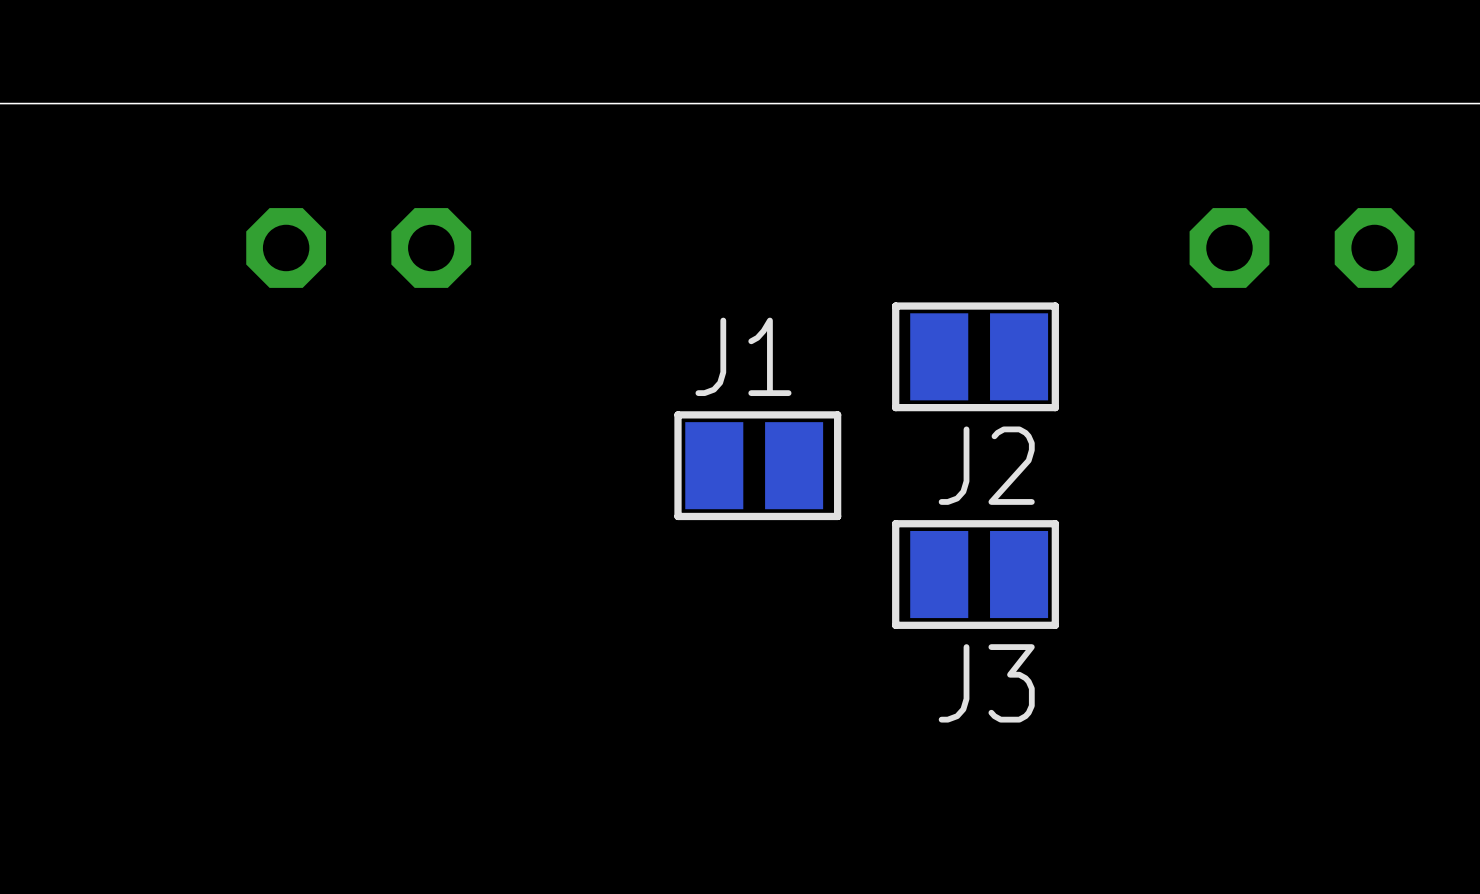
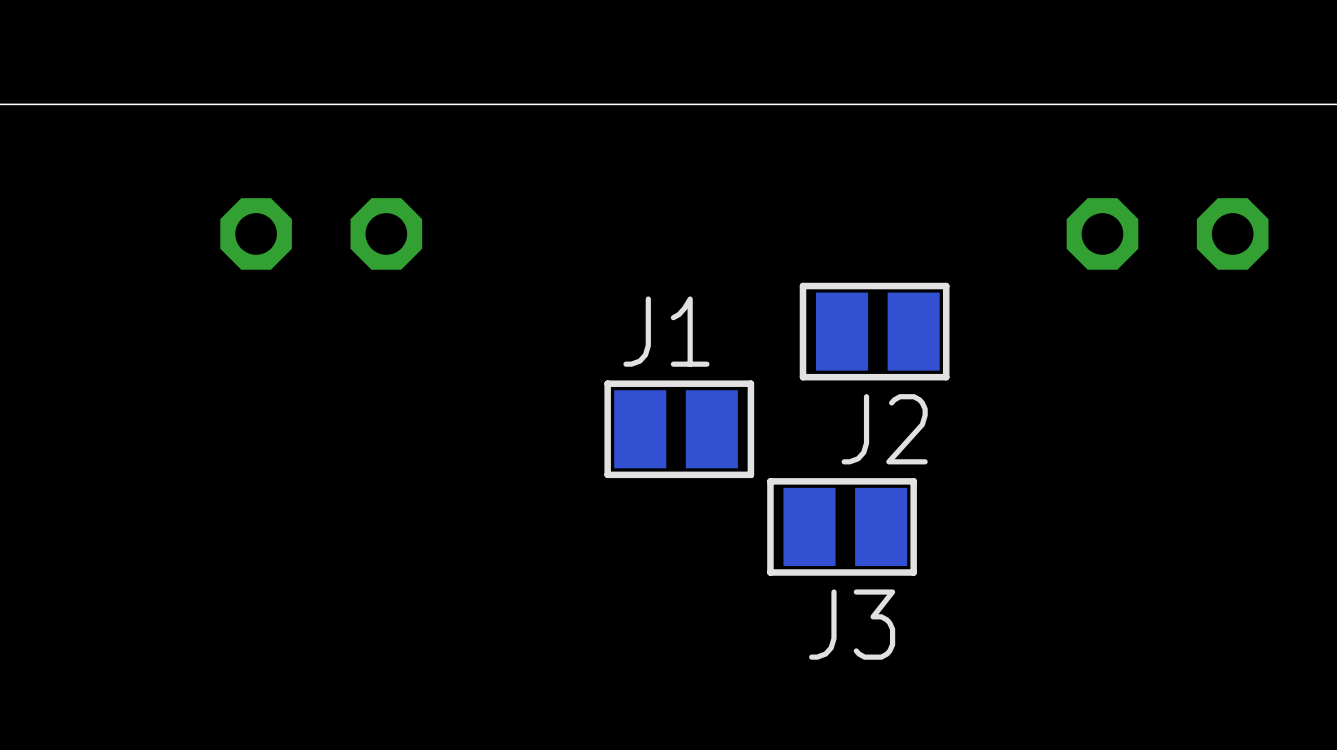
J3 position: (975, 574) -> (842, 526)

